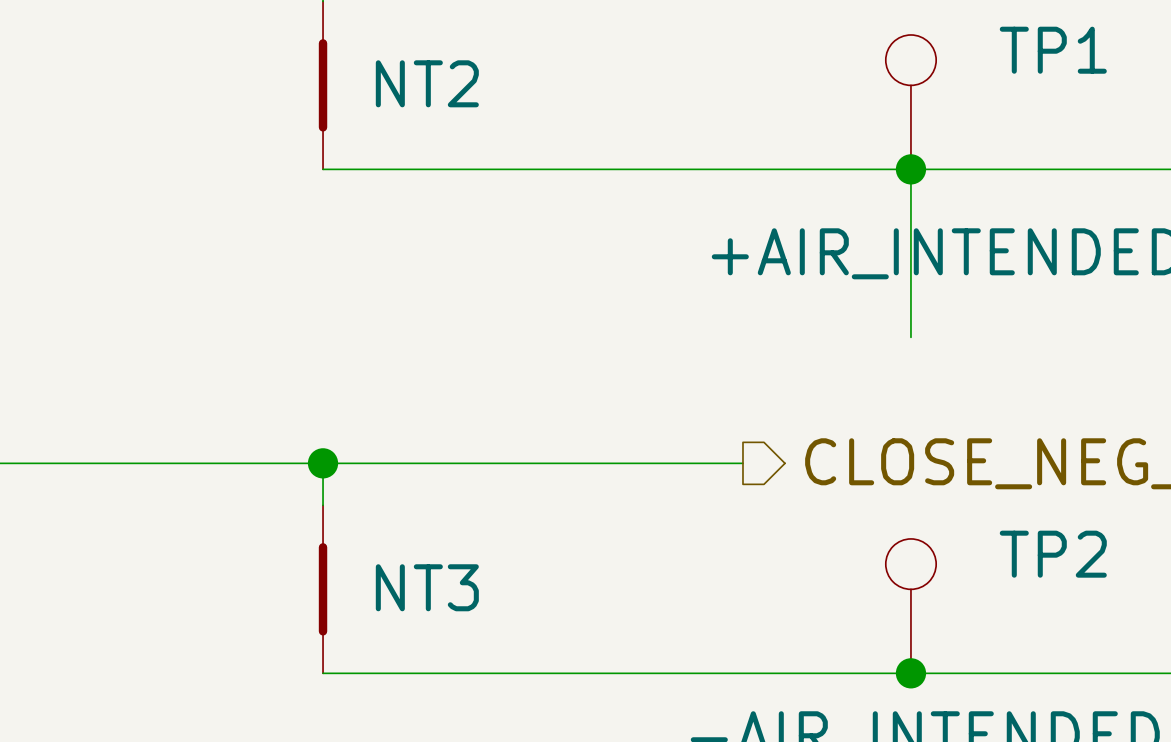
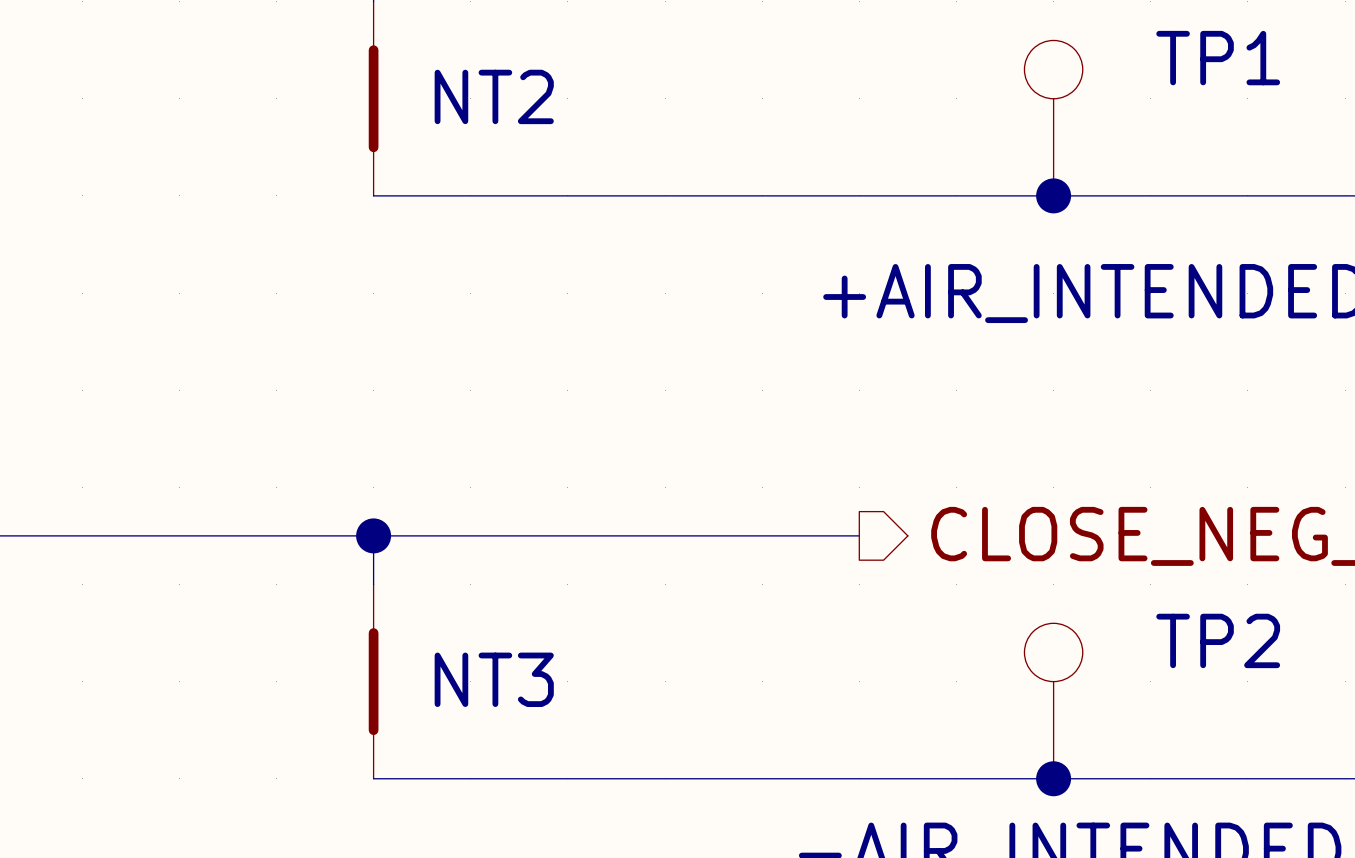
wire: (910, 169) (910, 337) -> none

